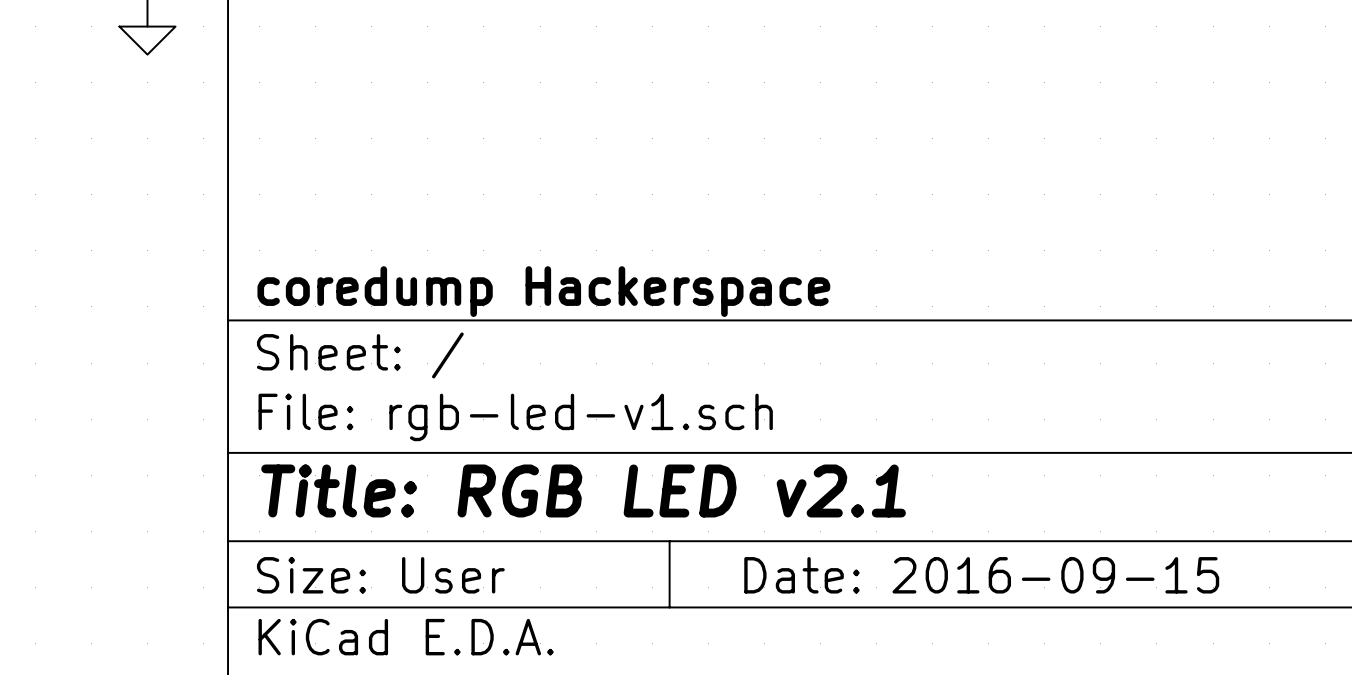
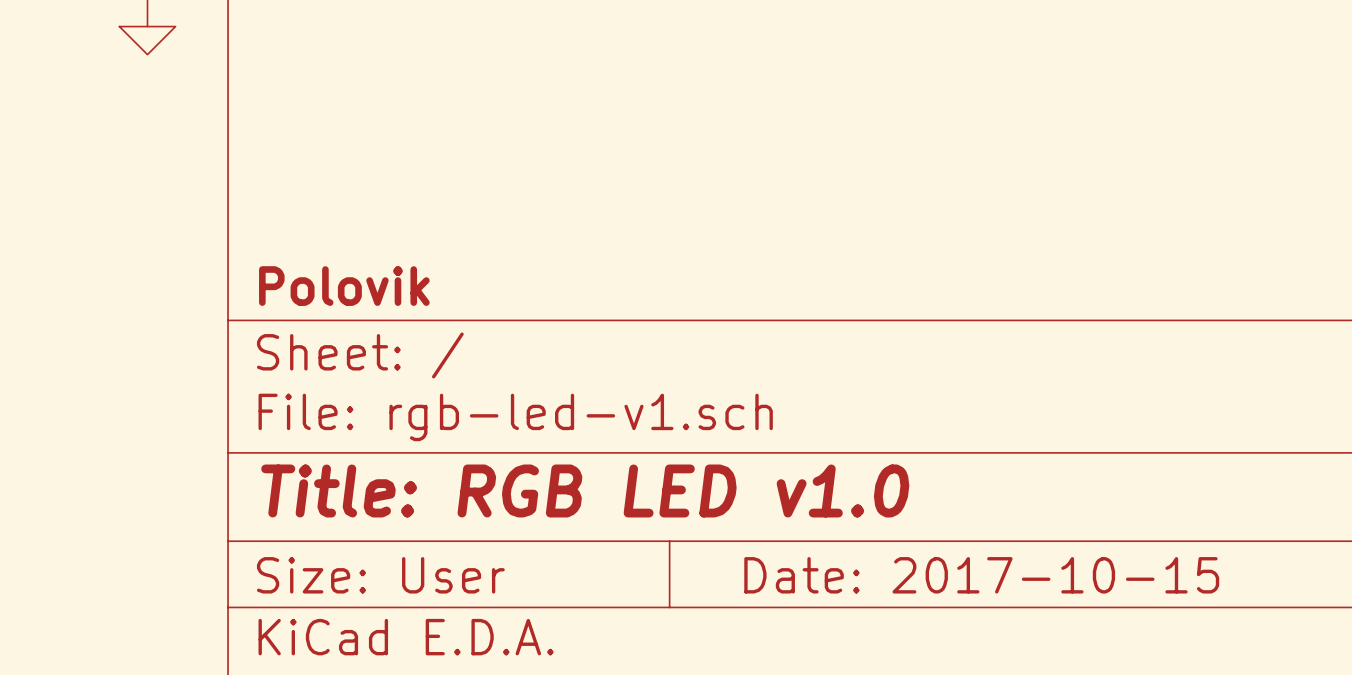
title block: coredump Hackerspace (543, 291) -> Polovik (344, 286)
title block: Title: RGB LED v2.1 (583, 490) -> Title: RGB LED v1.0 (585, 490)
title block: Date: 2016-09-15 (981, 575) -> Date: 2017-10-15 (981, 575)

